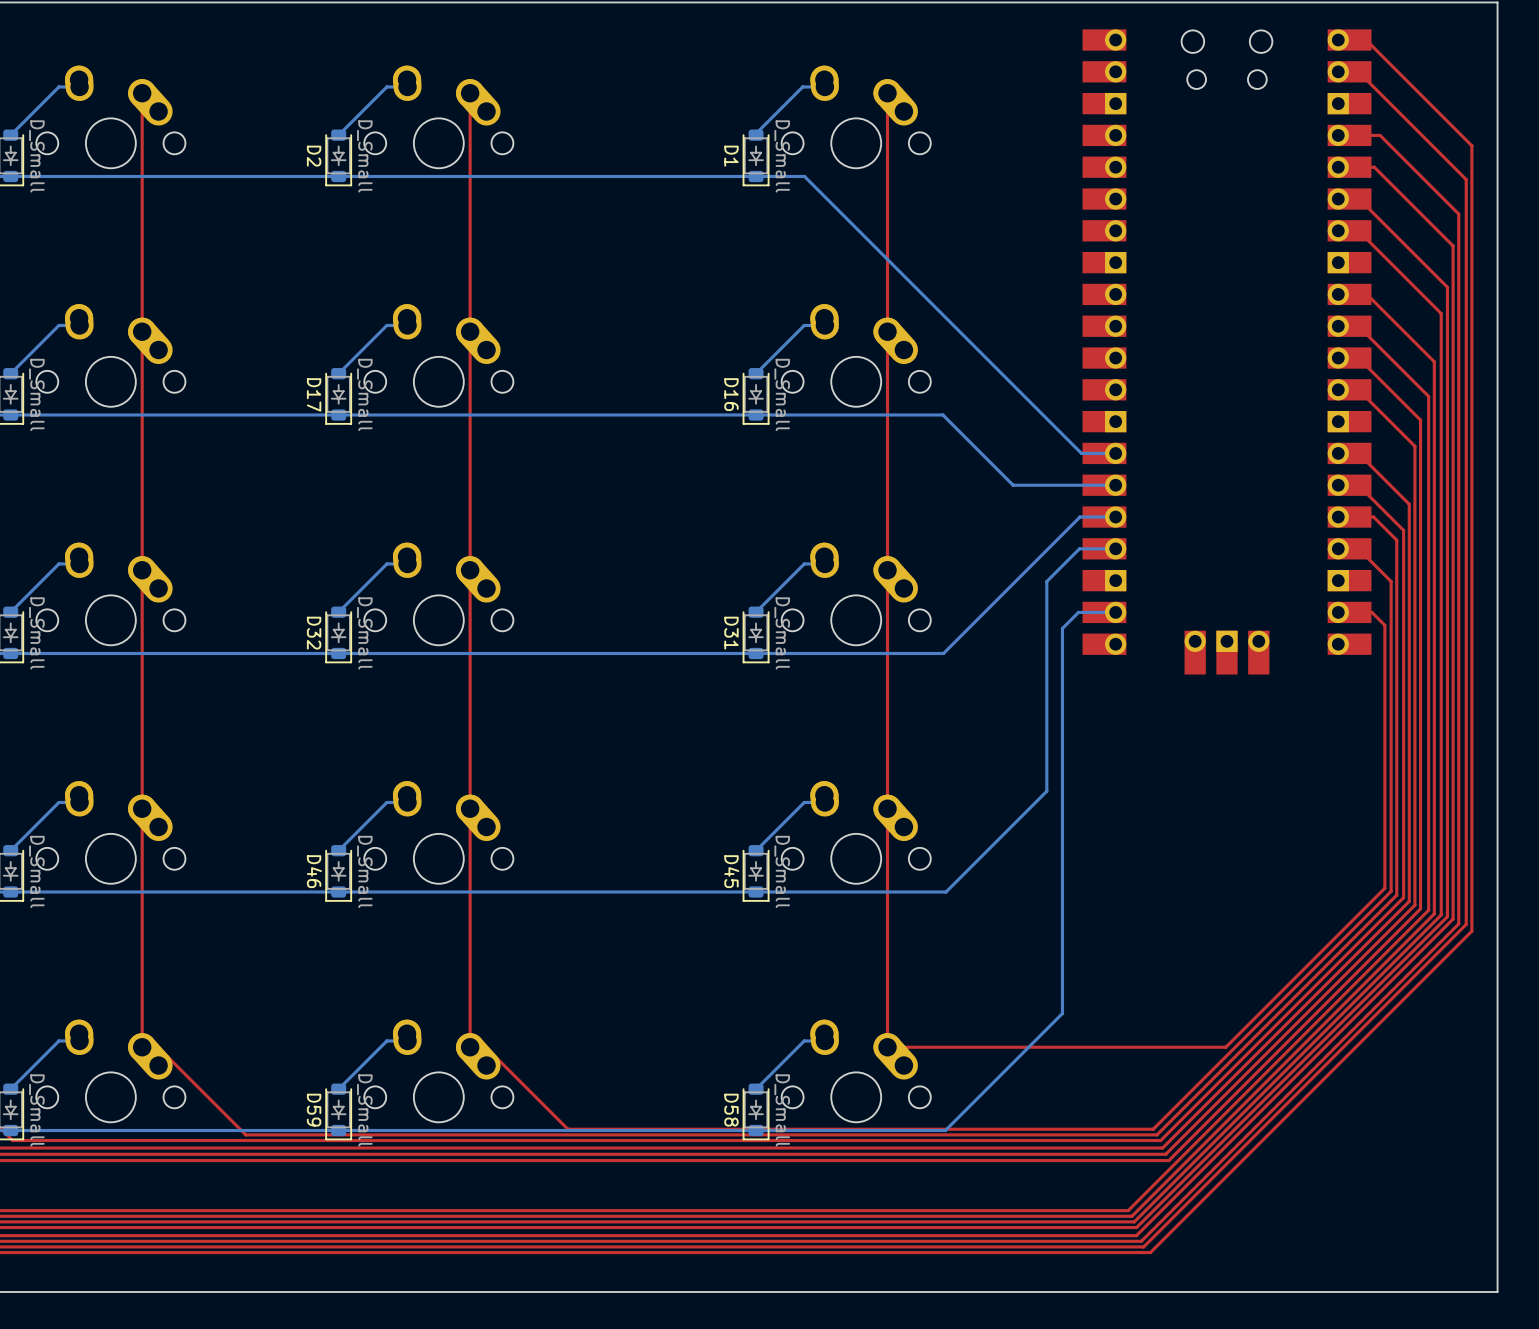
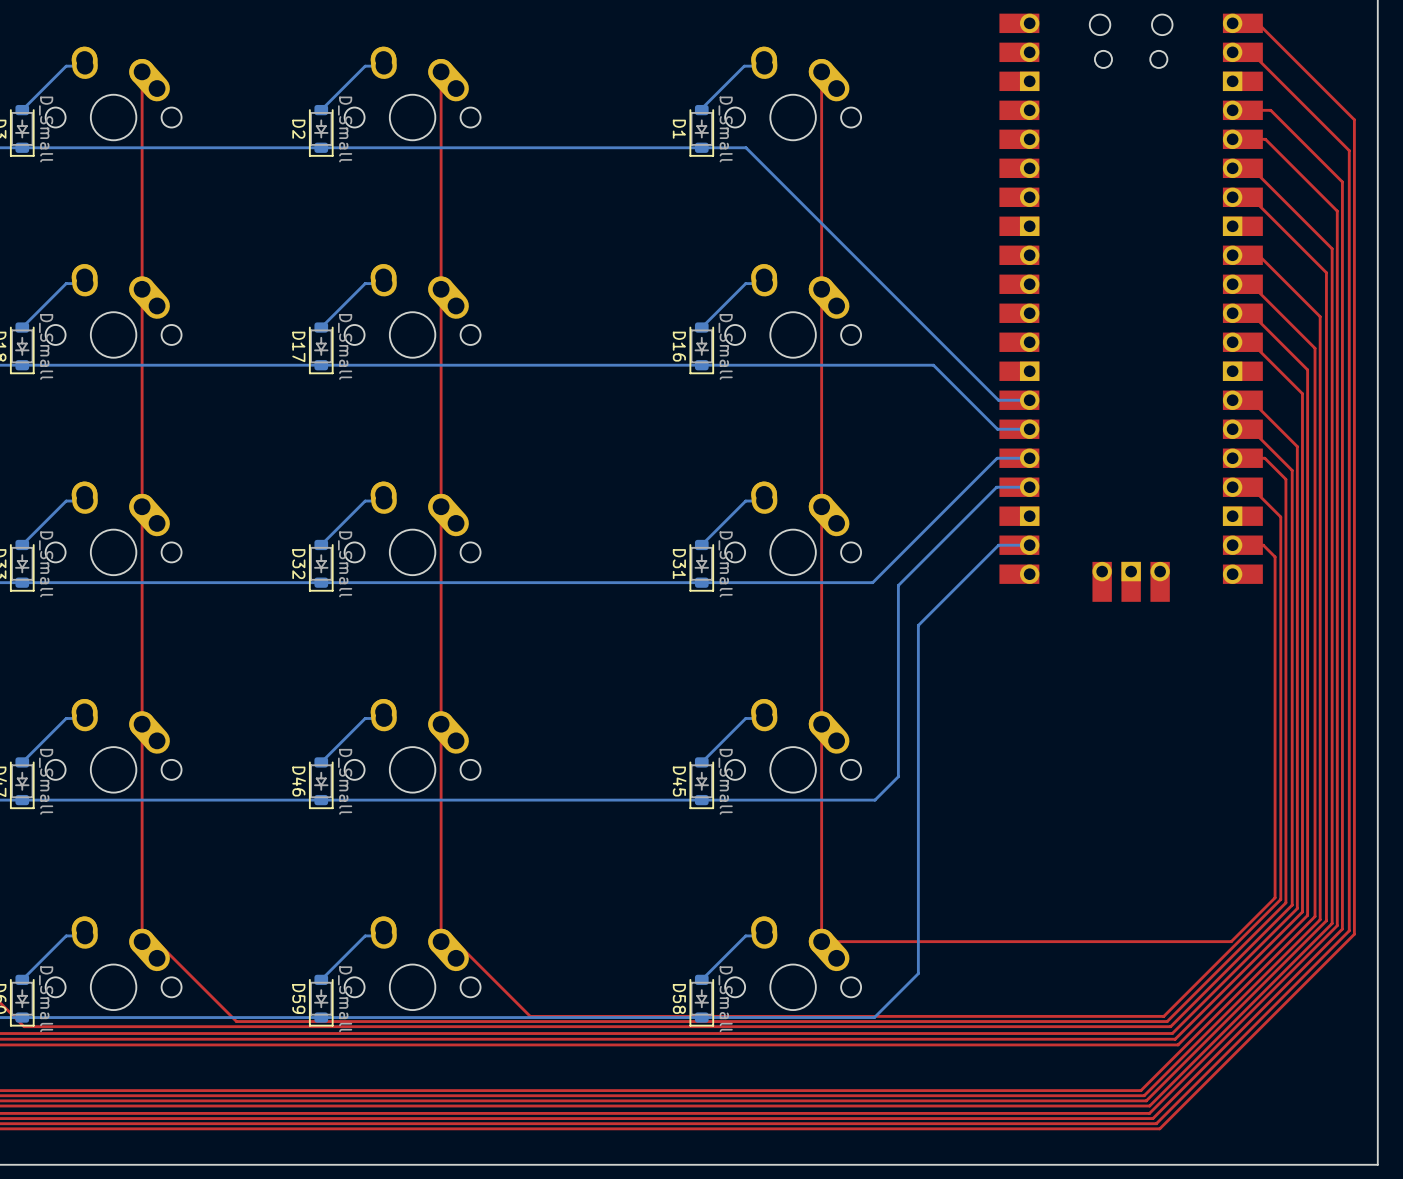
bottom track: (942, 414) (1013, 485) (1080, 485) -> (872, 365) (933, 365) (997, 429)
bottom track: (1046, 581) (1046, 791) (971, 866) -> (966, 517) (898, 585) (898, 776)
bottom track: (1081, 612) (1078, 612) (1062, 628) (1062, 1013) (993, 1082) -> (998, 545) (918, 625) (918, 973)
top track: (1384, 888) (1225, 1047) -> (1275, 796) (1275, 897) (1231, 941) (1130, 941)
top track: (1391, 891) (1153, 1129) -> (1280, 799) (1280, 899) (1163, 1016) (1063, 1016)
top track: (1396, 895) (1157, 1134) -> (1285, 802) (1285, 902) (1167, 1021) (1067, 1021)
top track: (1403, 897) (1160, 1140) -> (1292, 805) (1292, 905) (1170, 1026) (1070, 1026)
top track: (1409, 901) (1162, 1148) -> (1297, 808) (1297, 908) (1172, 1033) (1072, 1033)
top track: (1414, 905) (1165, 1154) -> (1302, 812) (1302, 911) (1175, 1039) (1075, 1039)
top track: (1420, 908) (1168, 1160) -> (1307, 815) (1307, 915) (1178, 1044) (1078, 1044)
top track: (1428, 910) (1128, 1210) -> (1315, 816) (1315, 916) (1140, 1090) (1041, 1090)
top track: (1434, 913) (1131, 1216) -> (1320, 820) (1320, 919) (1144, 1095) (1044, 1095)
top track: (1441, 914) (1134, 1221) -> (1326, 821) (1326, 920) (1146, 1100) (1046, 1100)
top track: (1447, 916) (1136, 1227) -> (1332, 822) (1332, 923) (1149, 1106) (1048, 1106)
top track: (1453, 919) (1136, 1235) -> (1337, 824) (1337, 925) (1149, 1113) (1048, 1113)
top track: (1458, 923) (1141, 1241) -> (1342, 829) (1342, 929) (1152, 1118) (1053, 1118)
top track: (1466, 924) (1143, 1246) -> (1349, 829) (1349, 930) (1156, 1123) (1055, 1123)
top track: (1471, 931) (1150, 1252) -> (1354, 835) (1354, 934) (1159, 1128) (1061, 1128)

